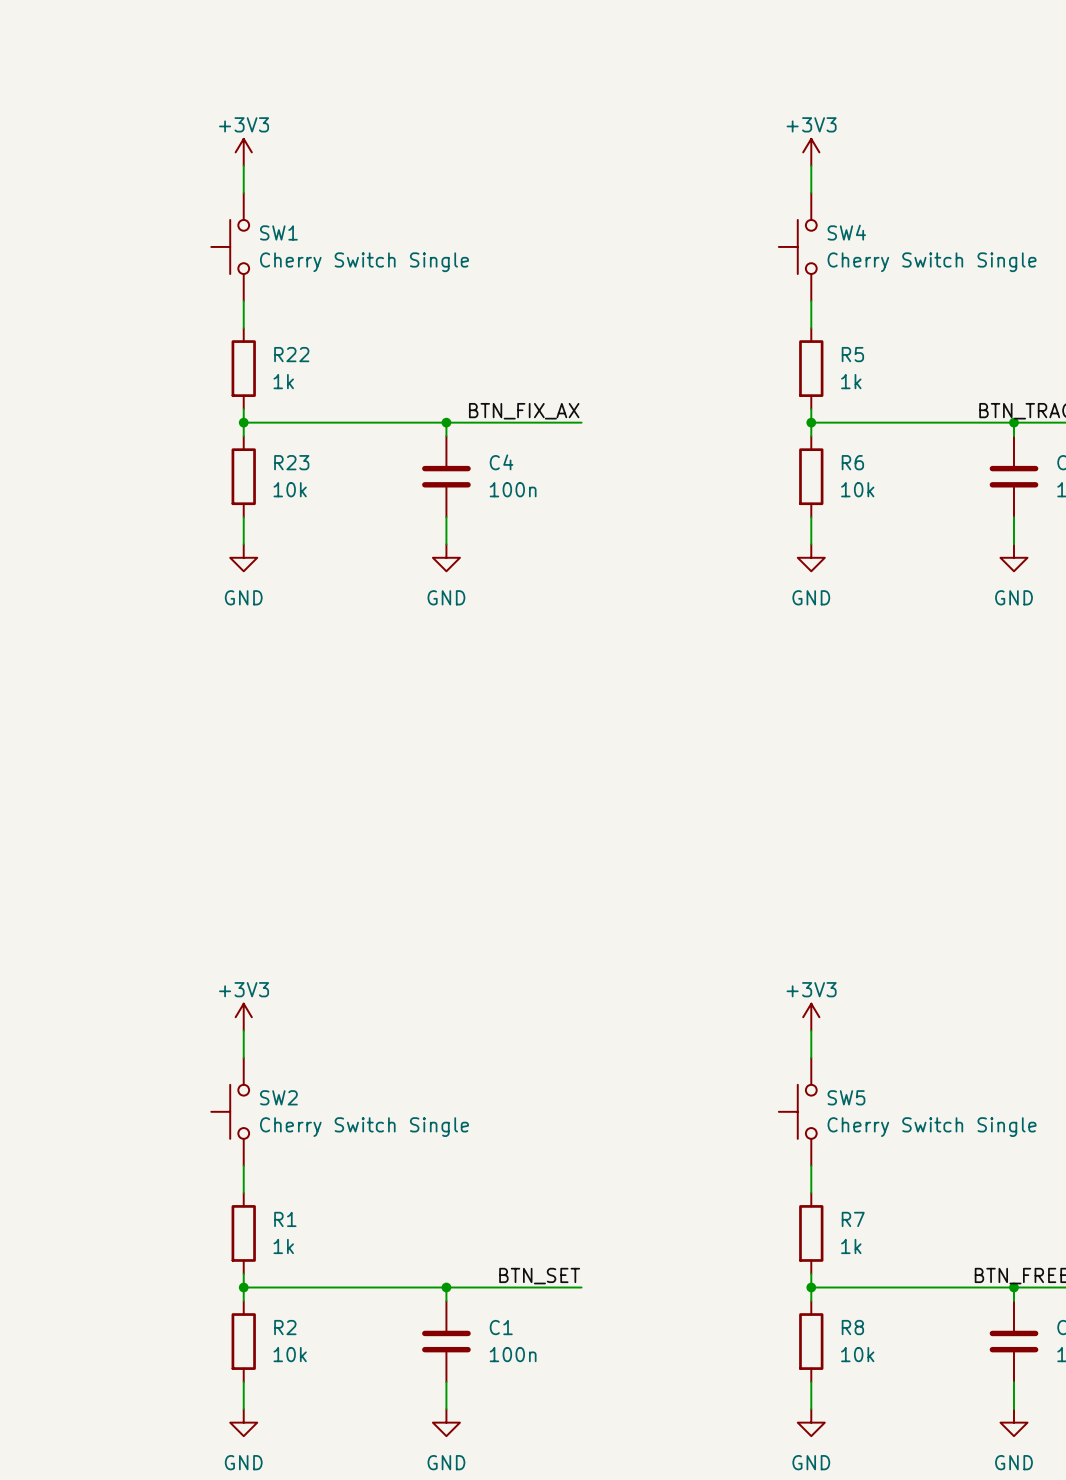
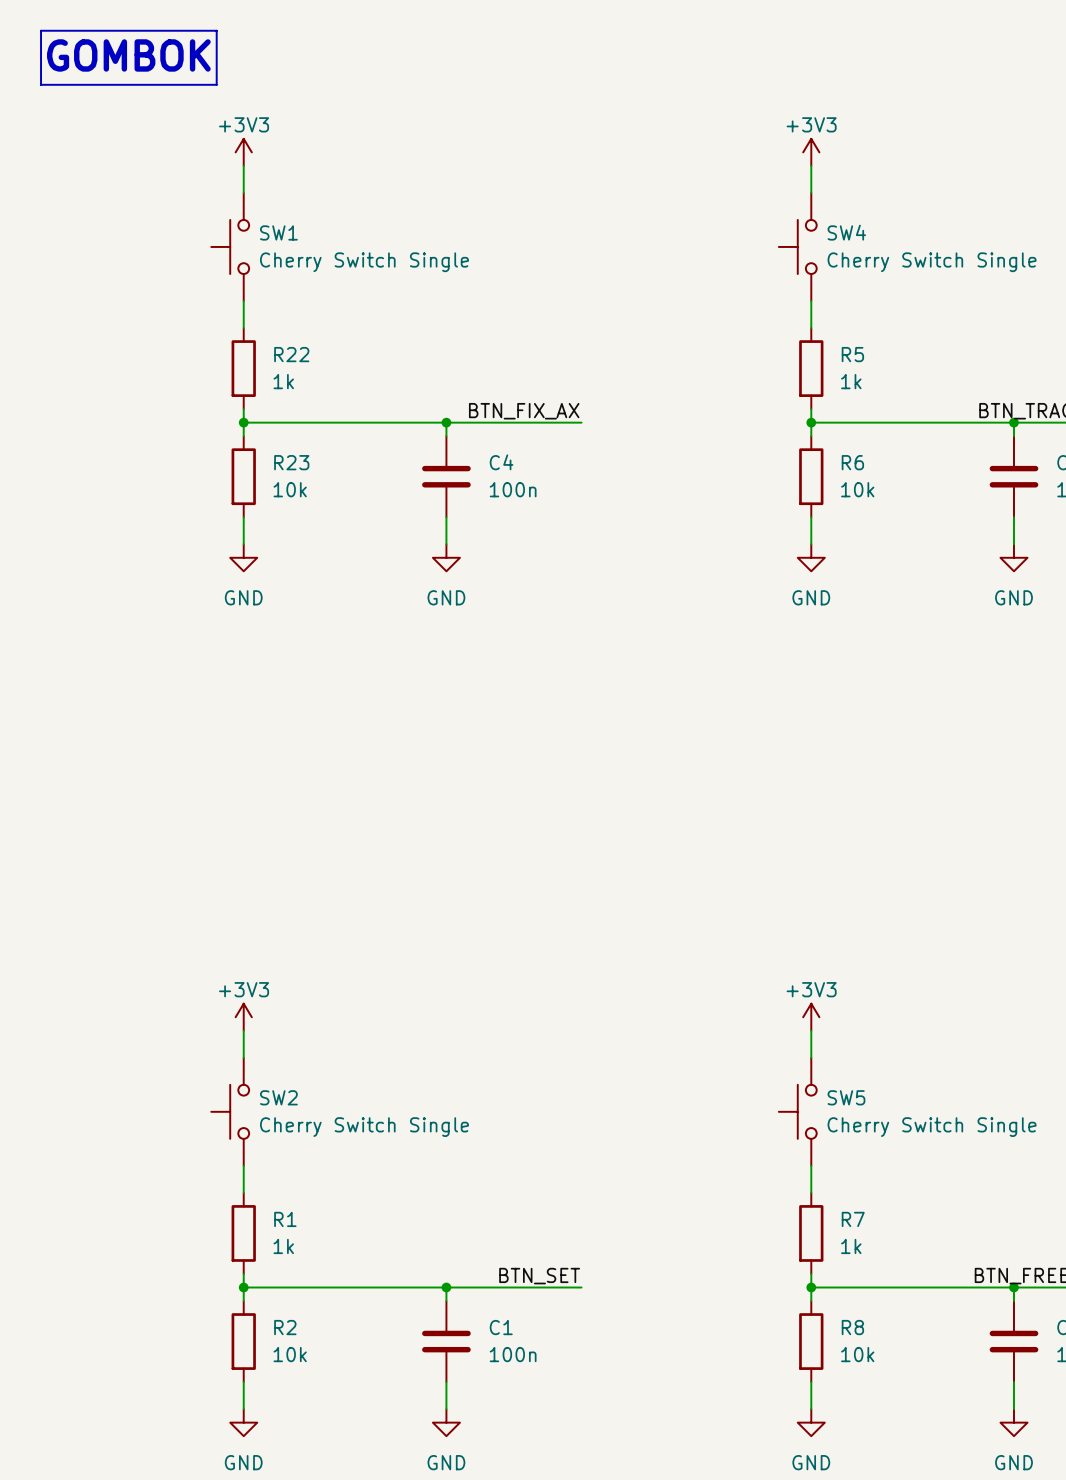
line: none -> (41, 30) (216, 30) (216, 84) (41, 84) (41, 30)
text: none -> GOMBOK (128, 55)

